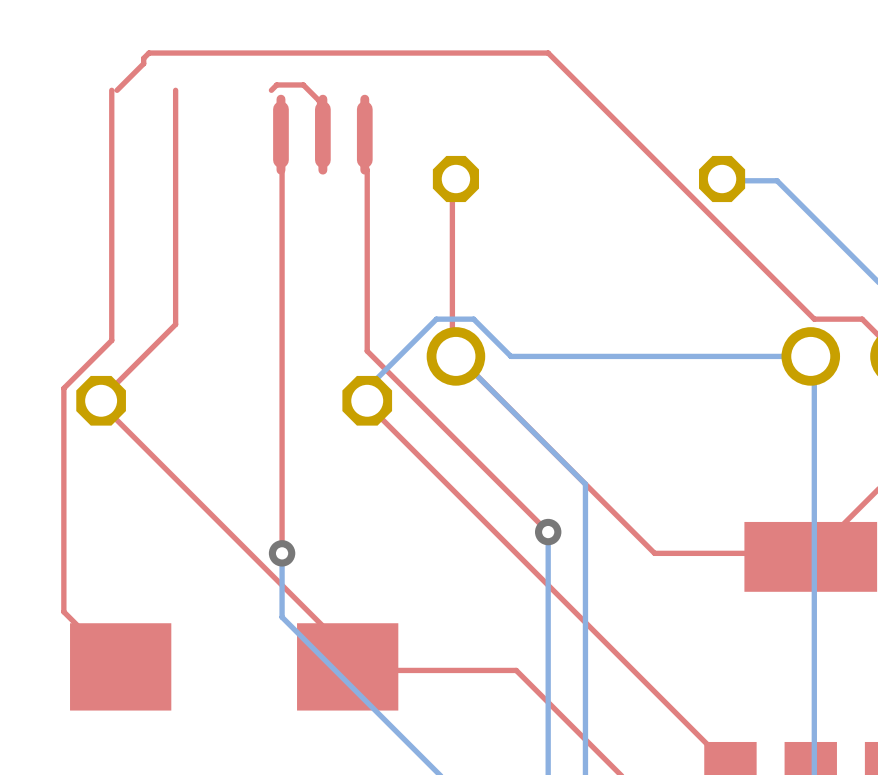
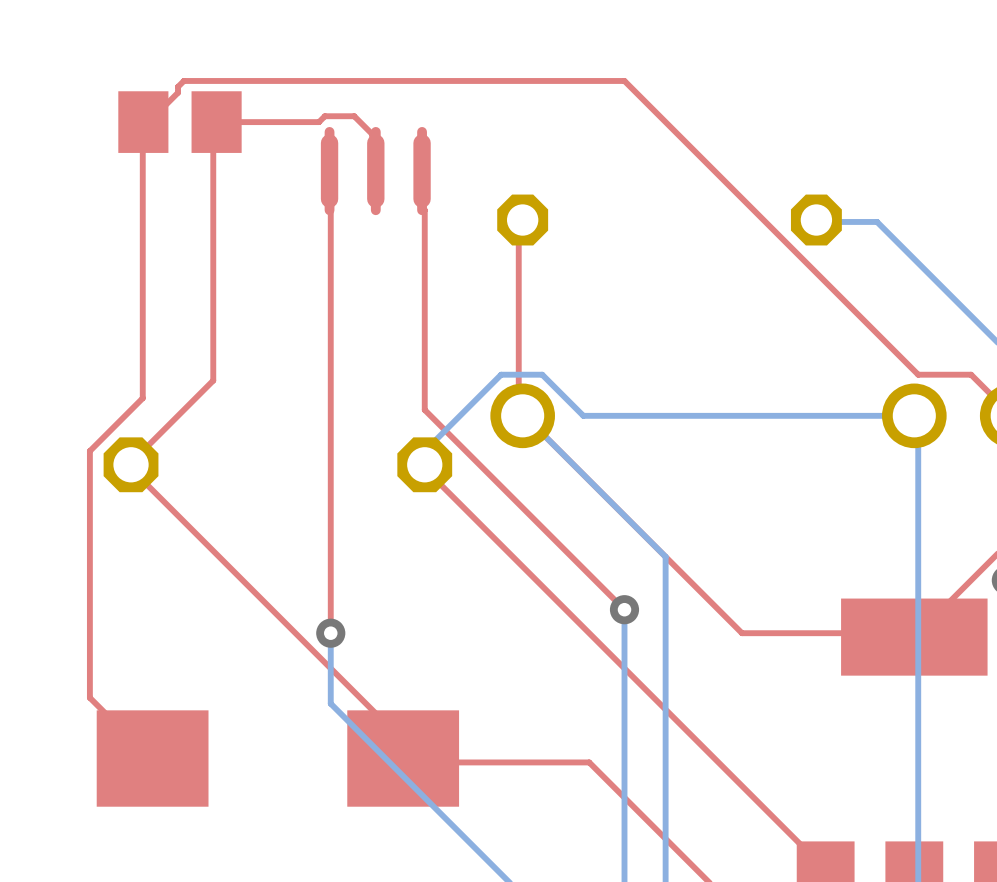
part: none -> (179, 122)
top track: none -> (319, 122) (213, 122)

